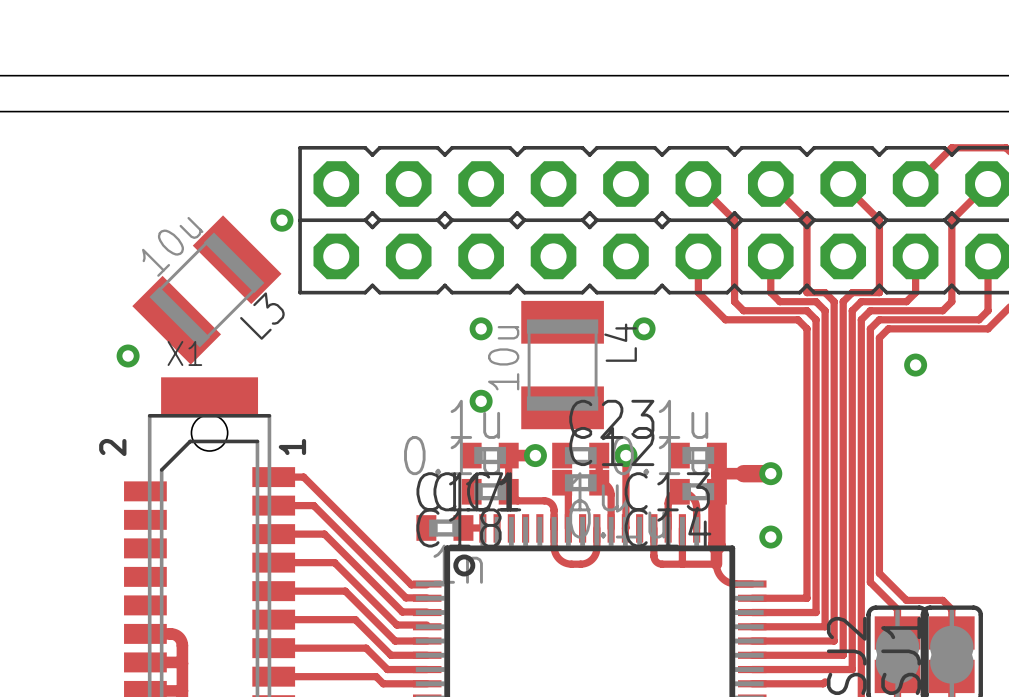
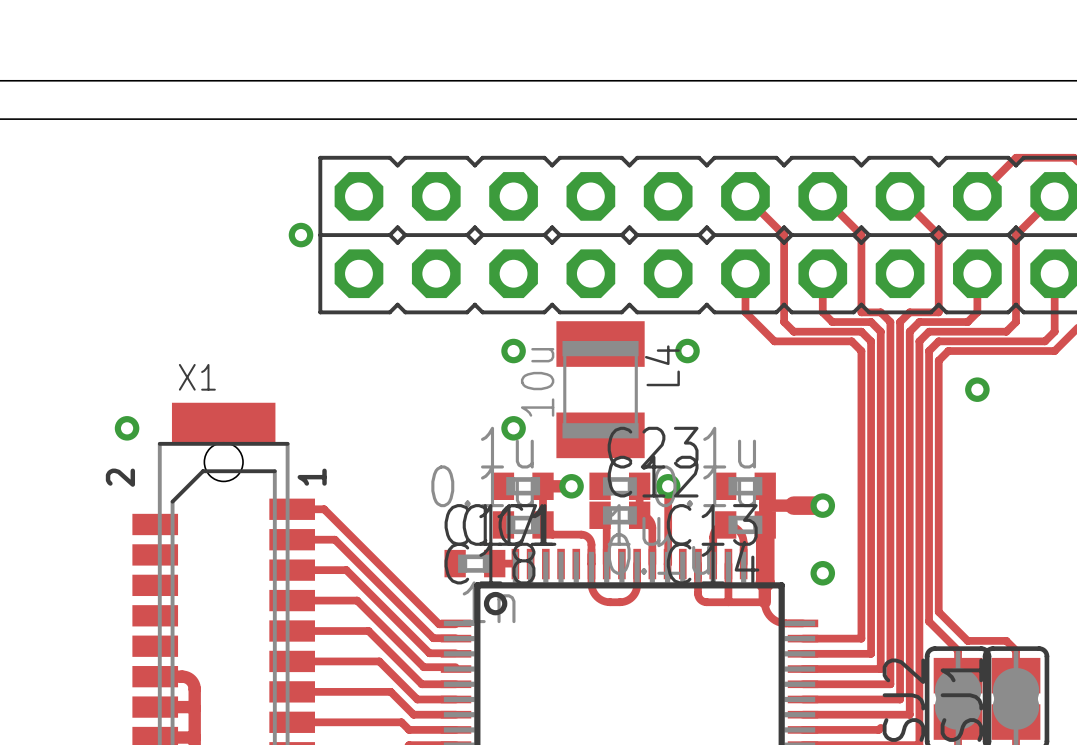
L3: 10u (206, 289) -> none
via position: (128, 356) -> (127, 428)

